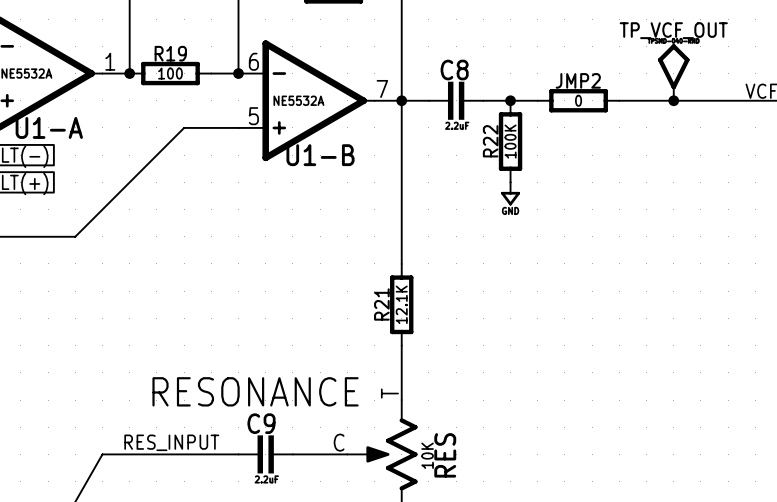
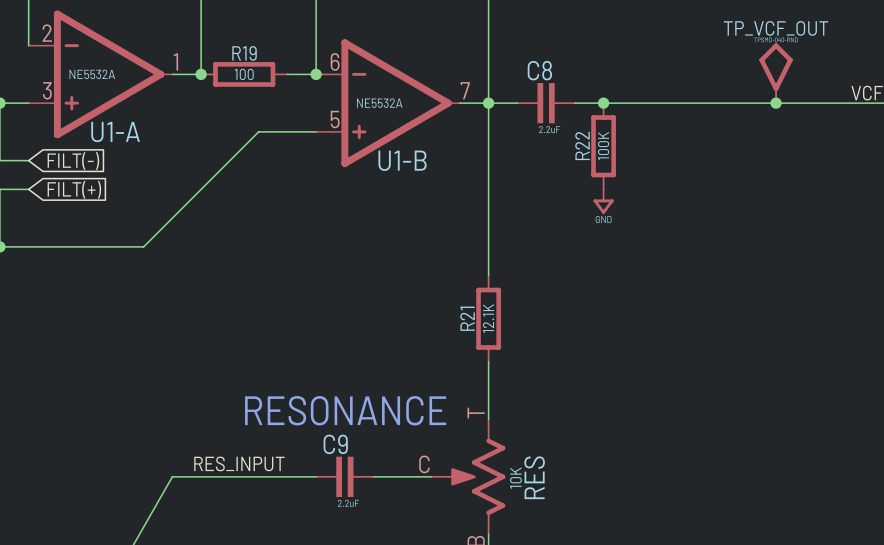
wire: none -> (632, 103) (718, 103)
JMP2: 0 (578, 100) -> none

